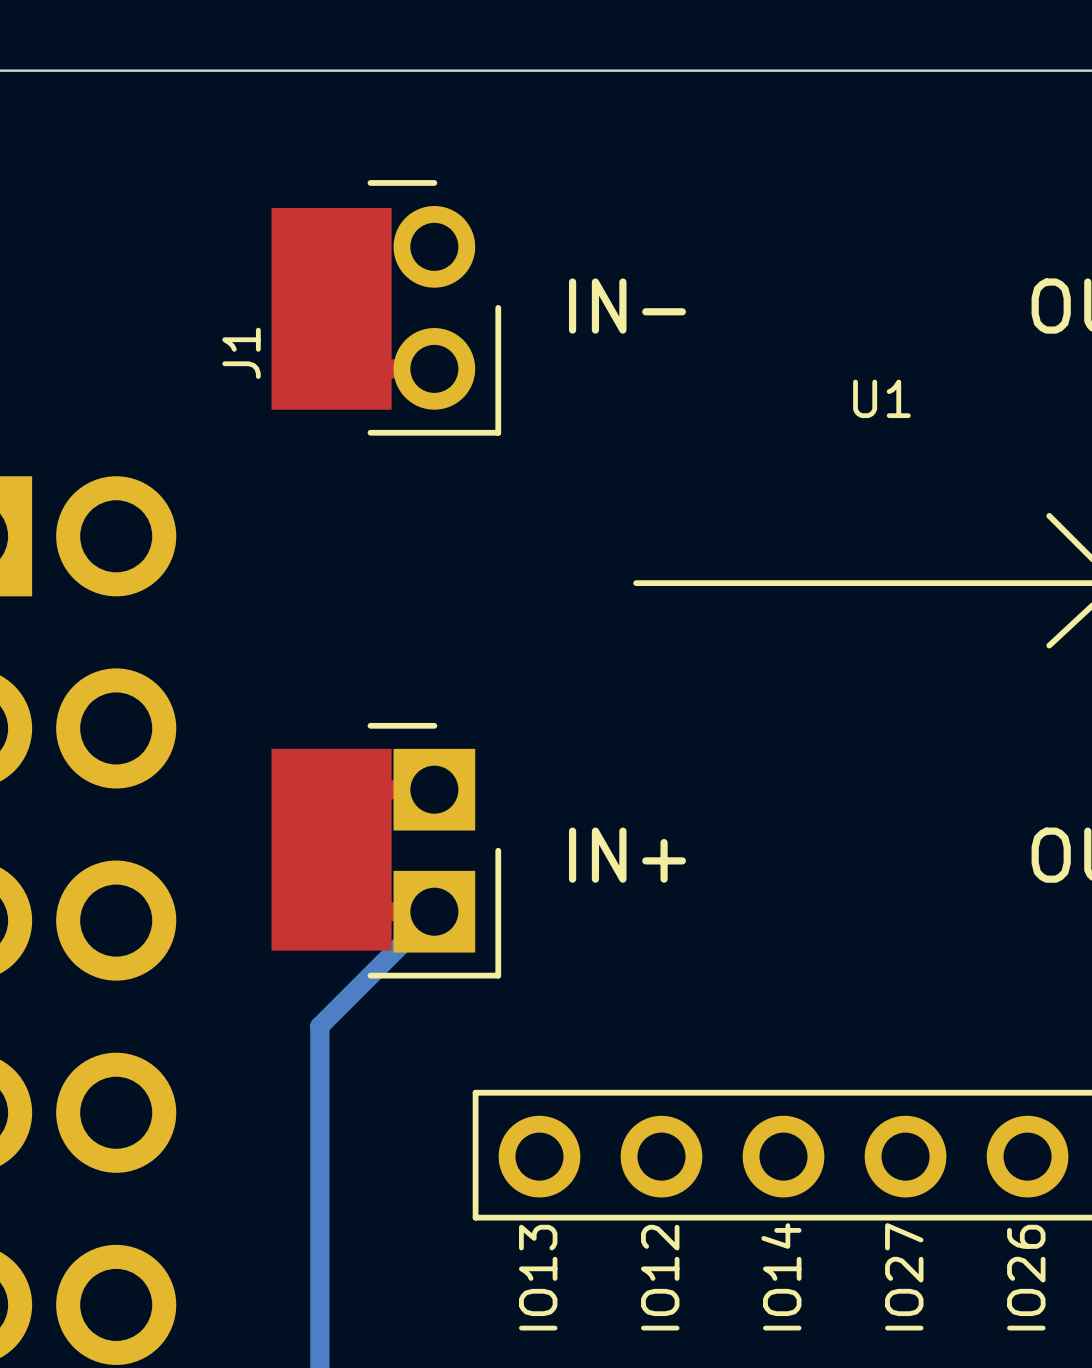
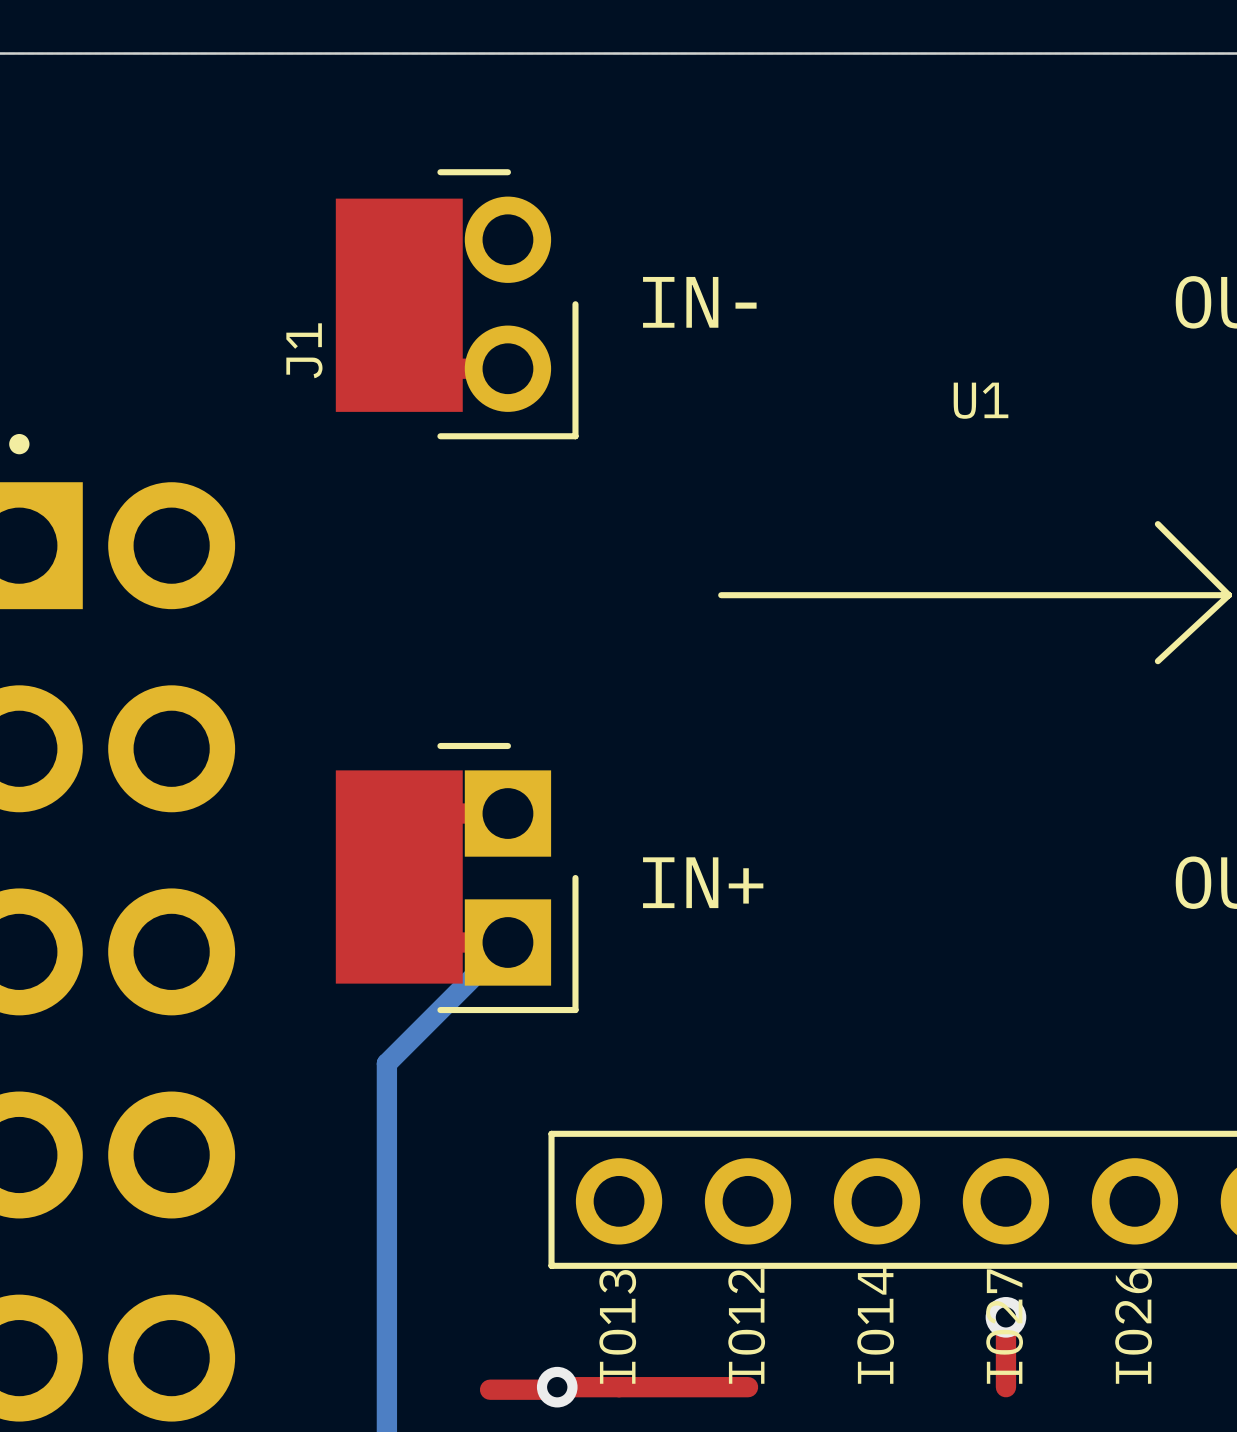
top track: none -> (1005, 1317) (1005, 1387)
via: none -> (1005, 1317)
via: none -> (557, 1387)
top track: none -> (748, 1387) (557, 1387) (554, 1389) (490, 1389)

